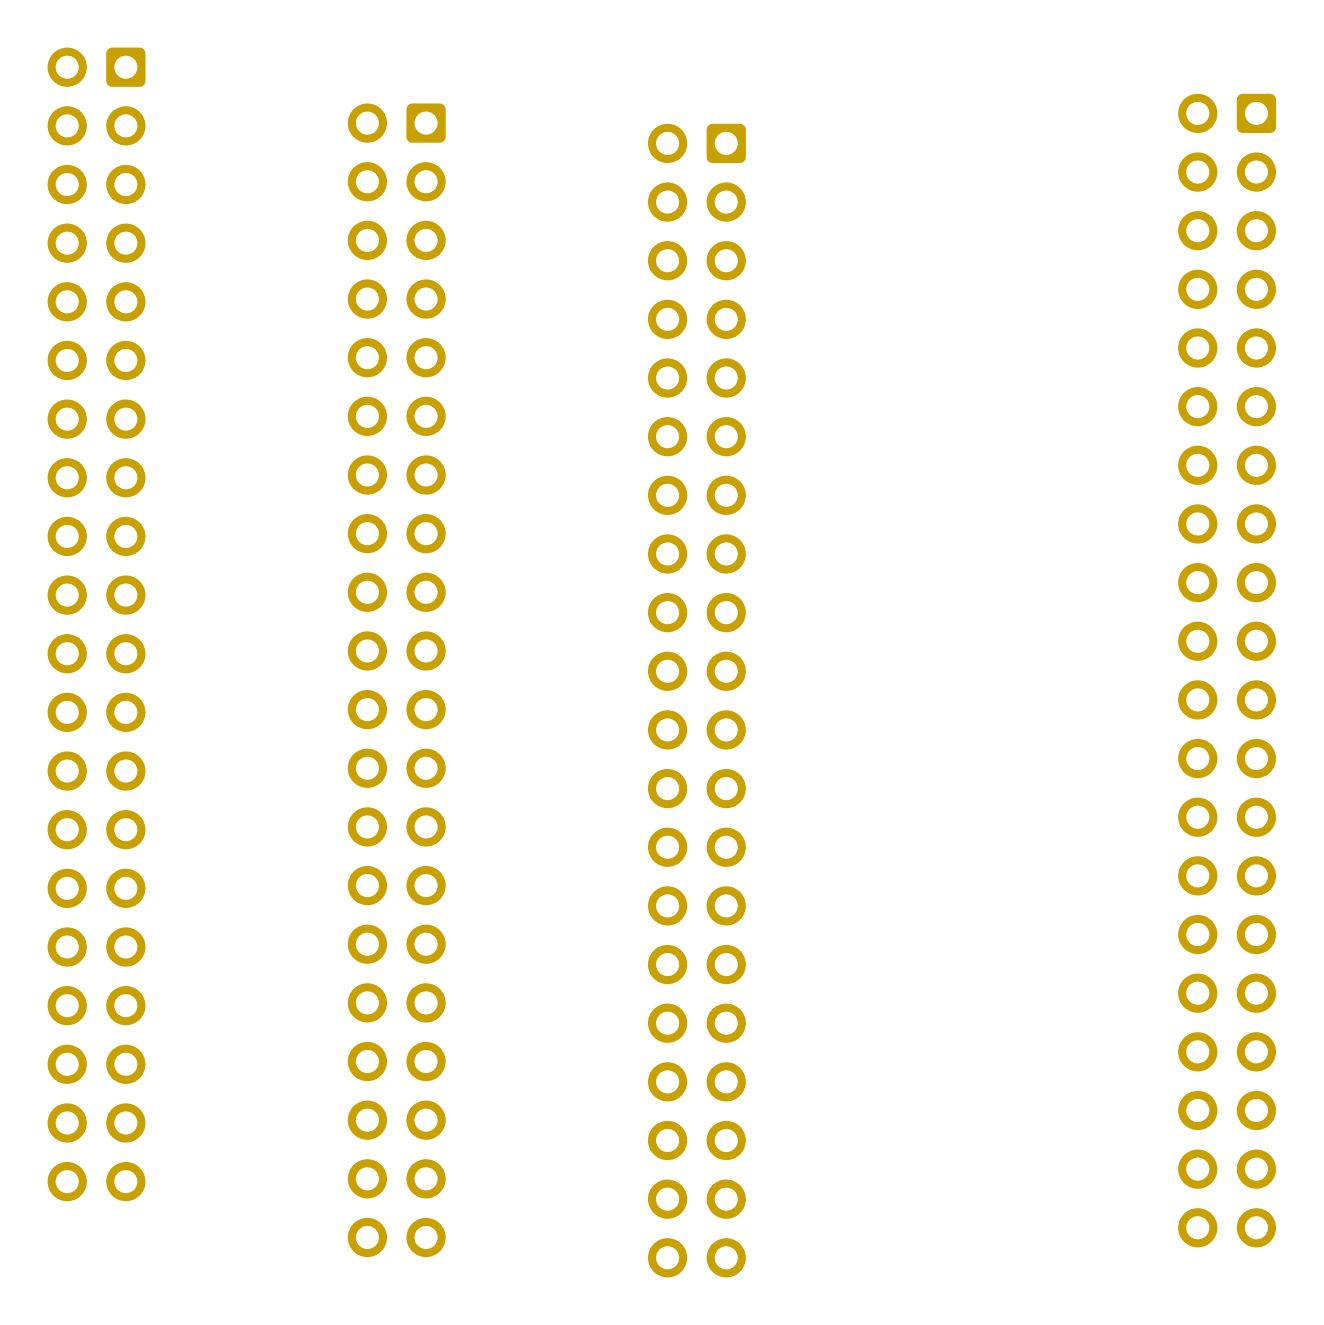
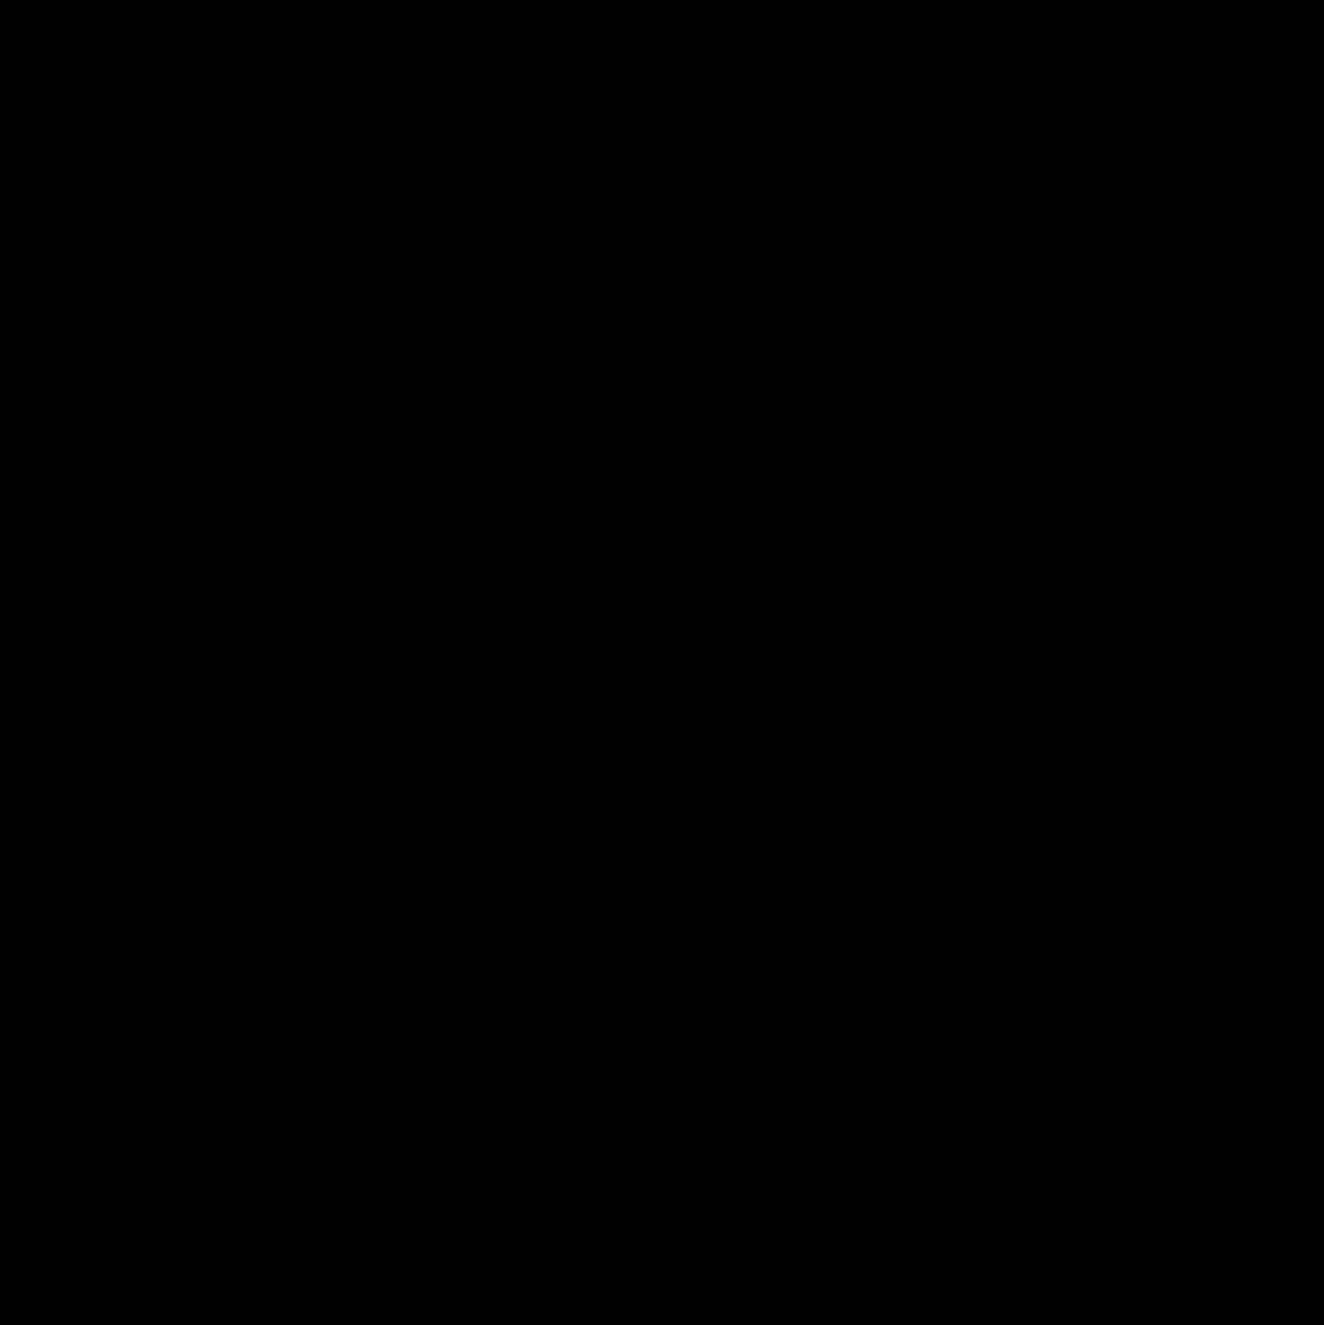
part: (96, 624) -> none
part: (1227, 670) -> none
part: (396, 680) -> none
part: (696, 700) -> none

